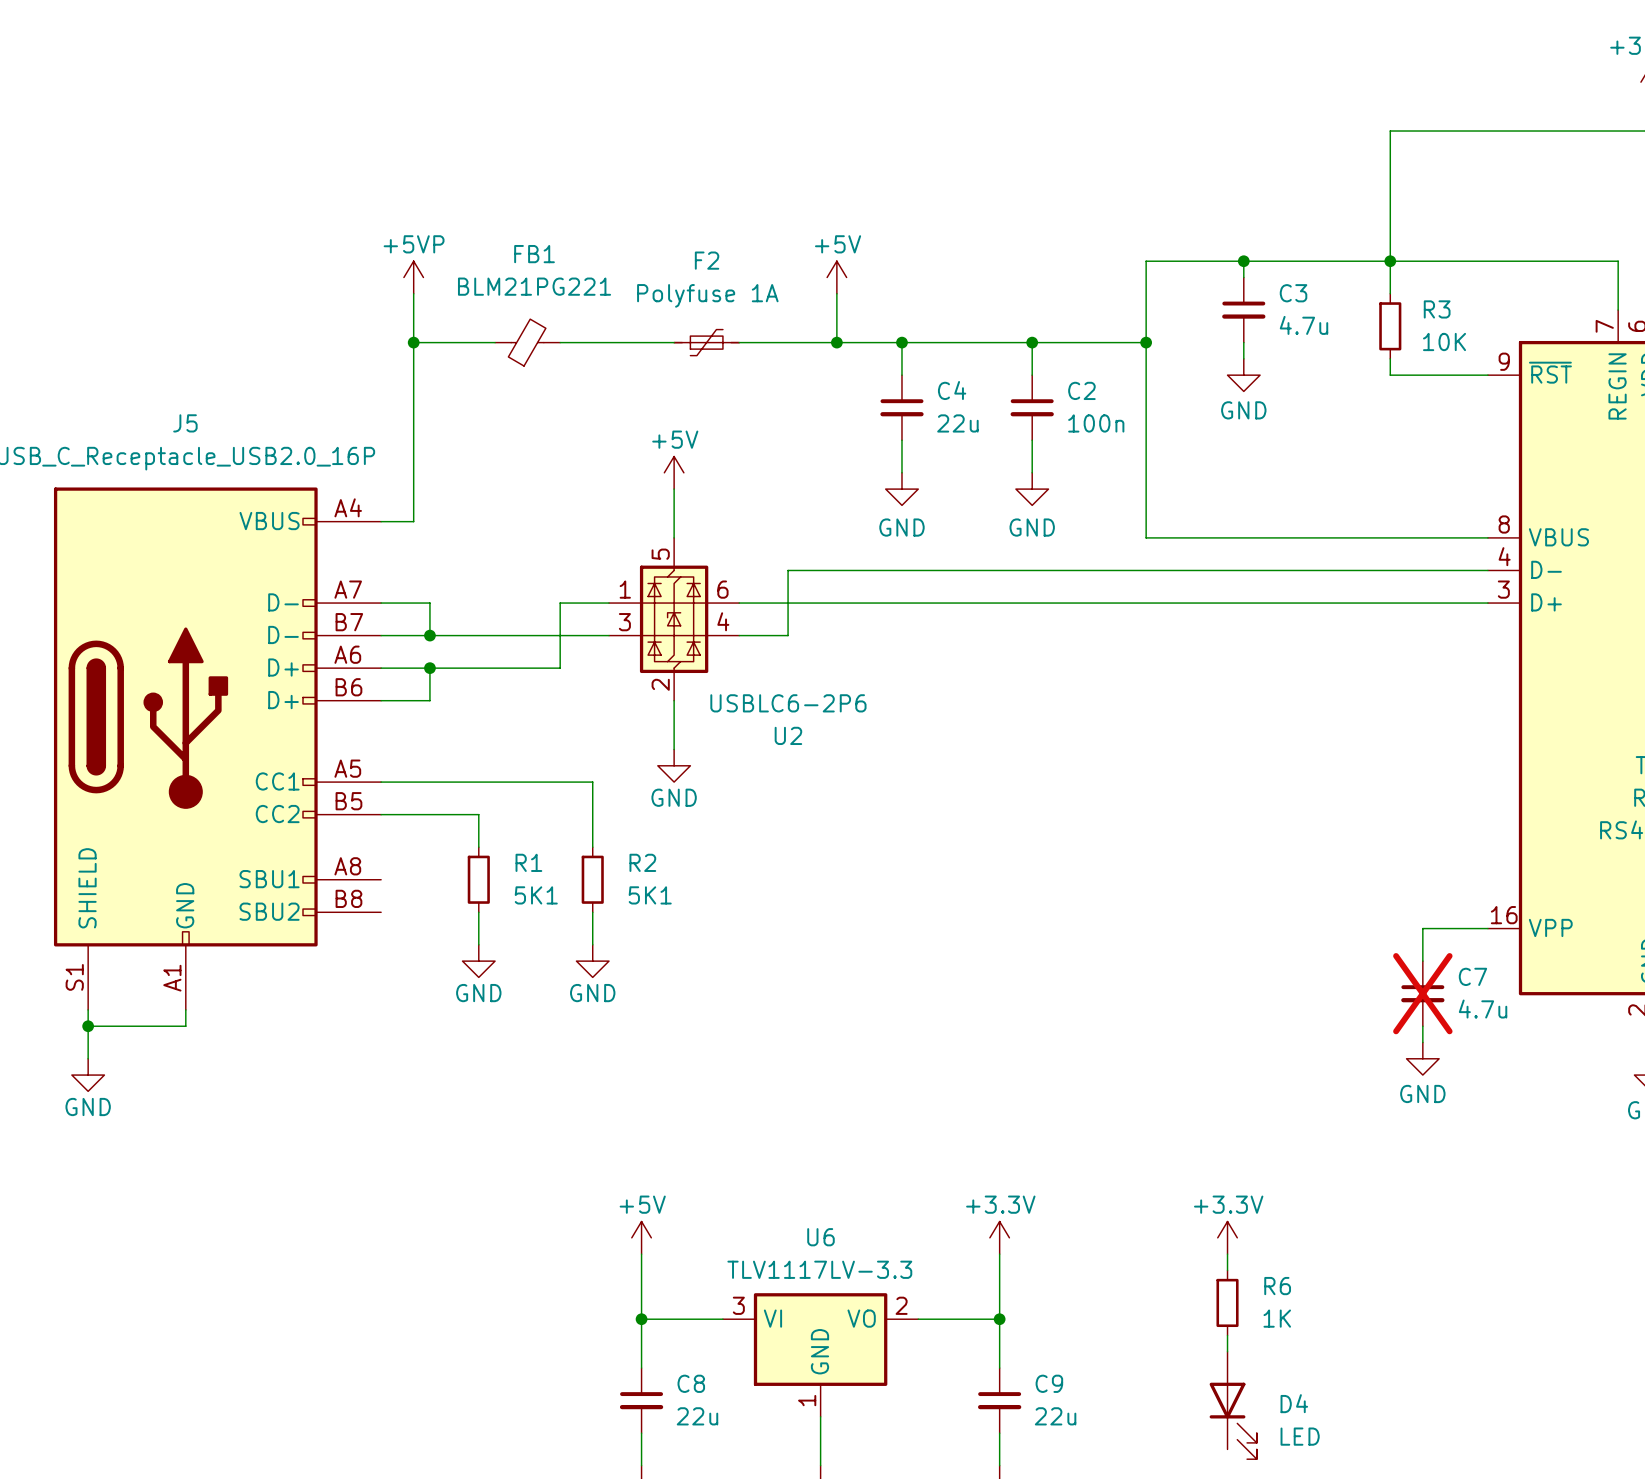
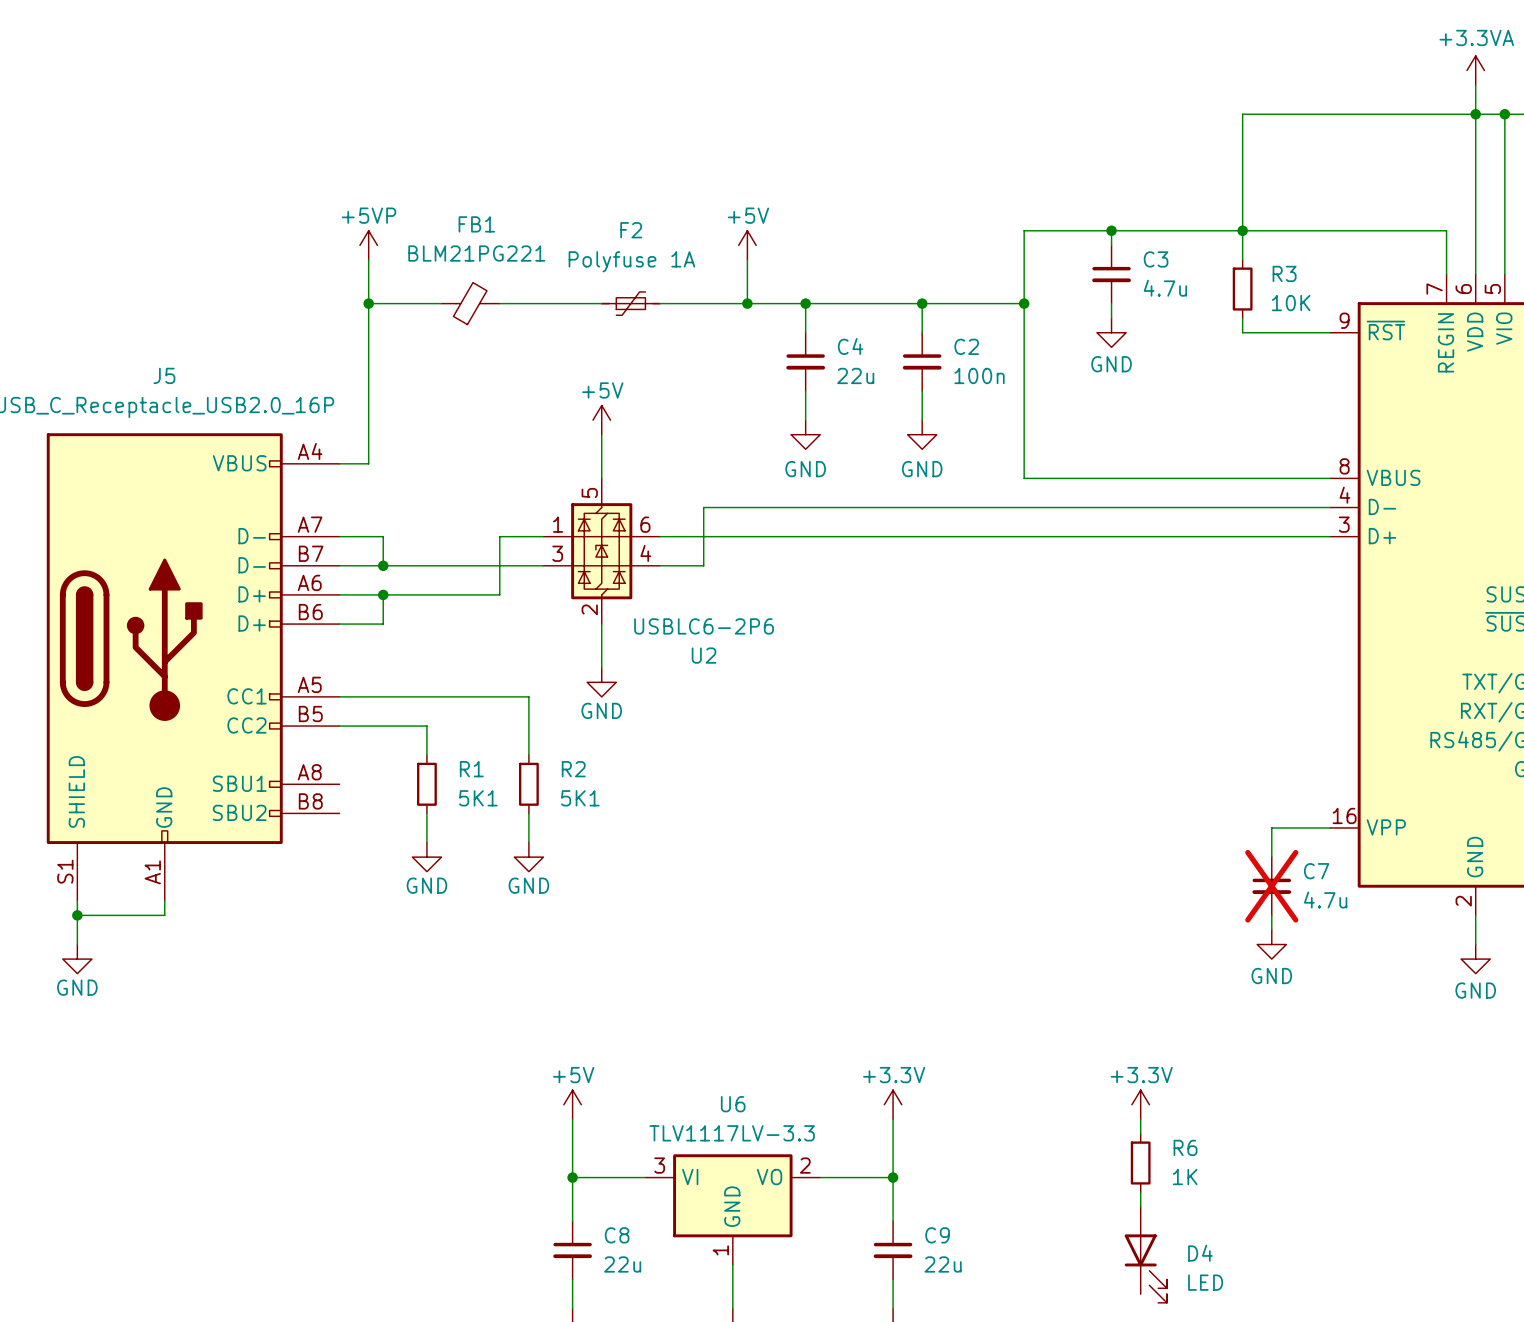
power symbol position: +3.3V (1227, 1237) -> +3.3V (1140, 1104)
wire: (1227, 1254) (1227, 1270) -> (1140, 1119) (1140, 1133)
R6 position: (1227, 1302) -> (1140, 1163)
wire: (1227, 1335) (1227, 1351) -> (1140, 1192) (1140, 1206)
D4 position: (1233, 1405) -> (1145, 1254)

